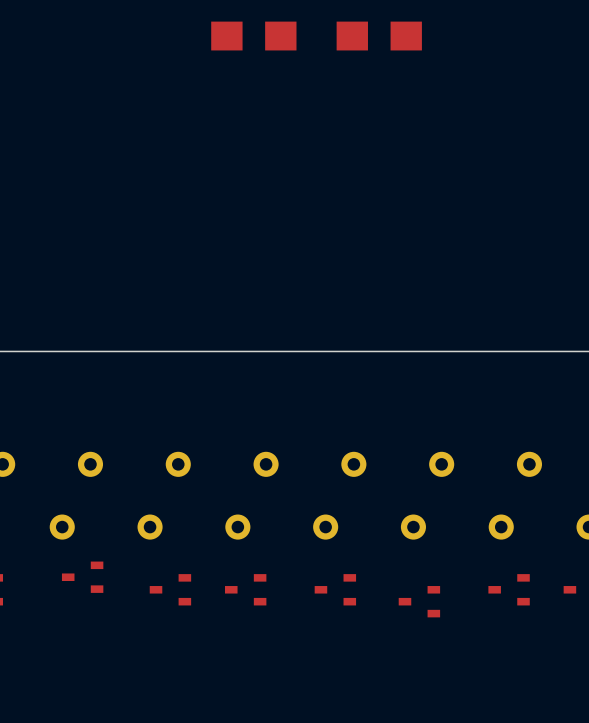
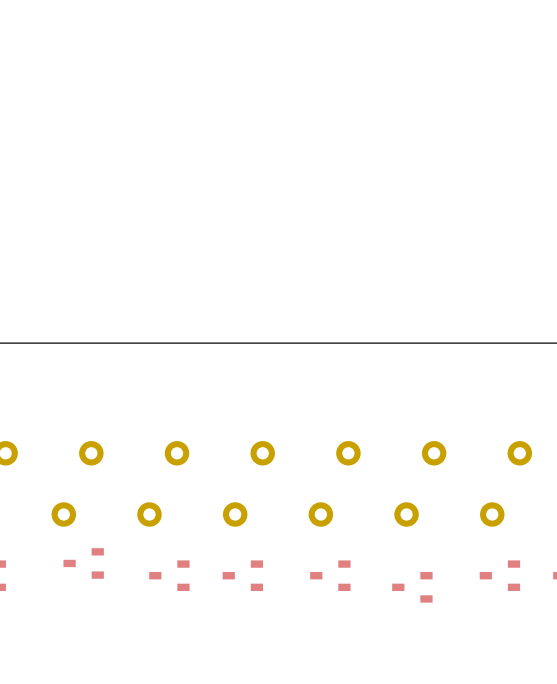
part: (253, 36) -> none
part: (379, 36) -> none

